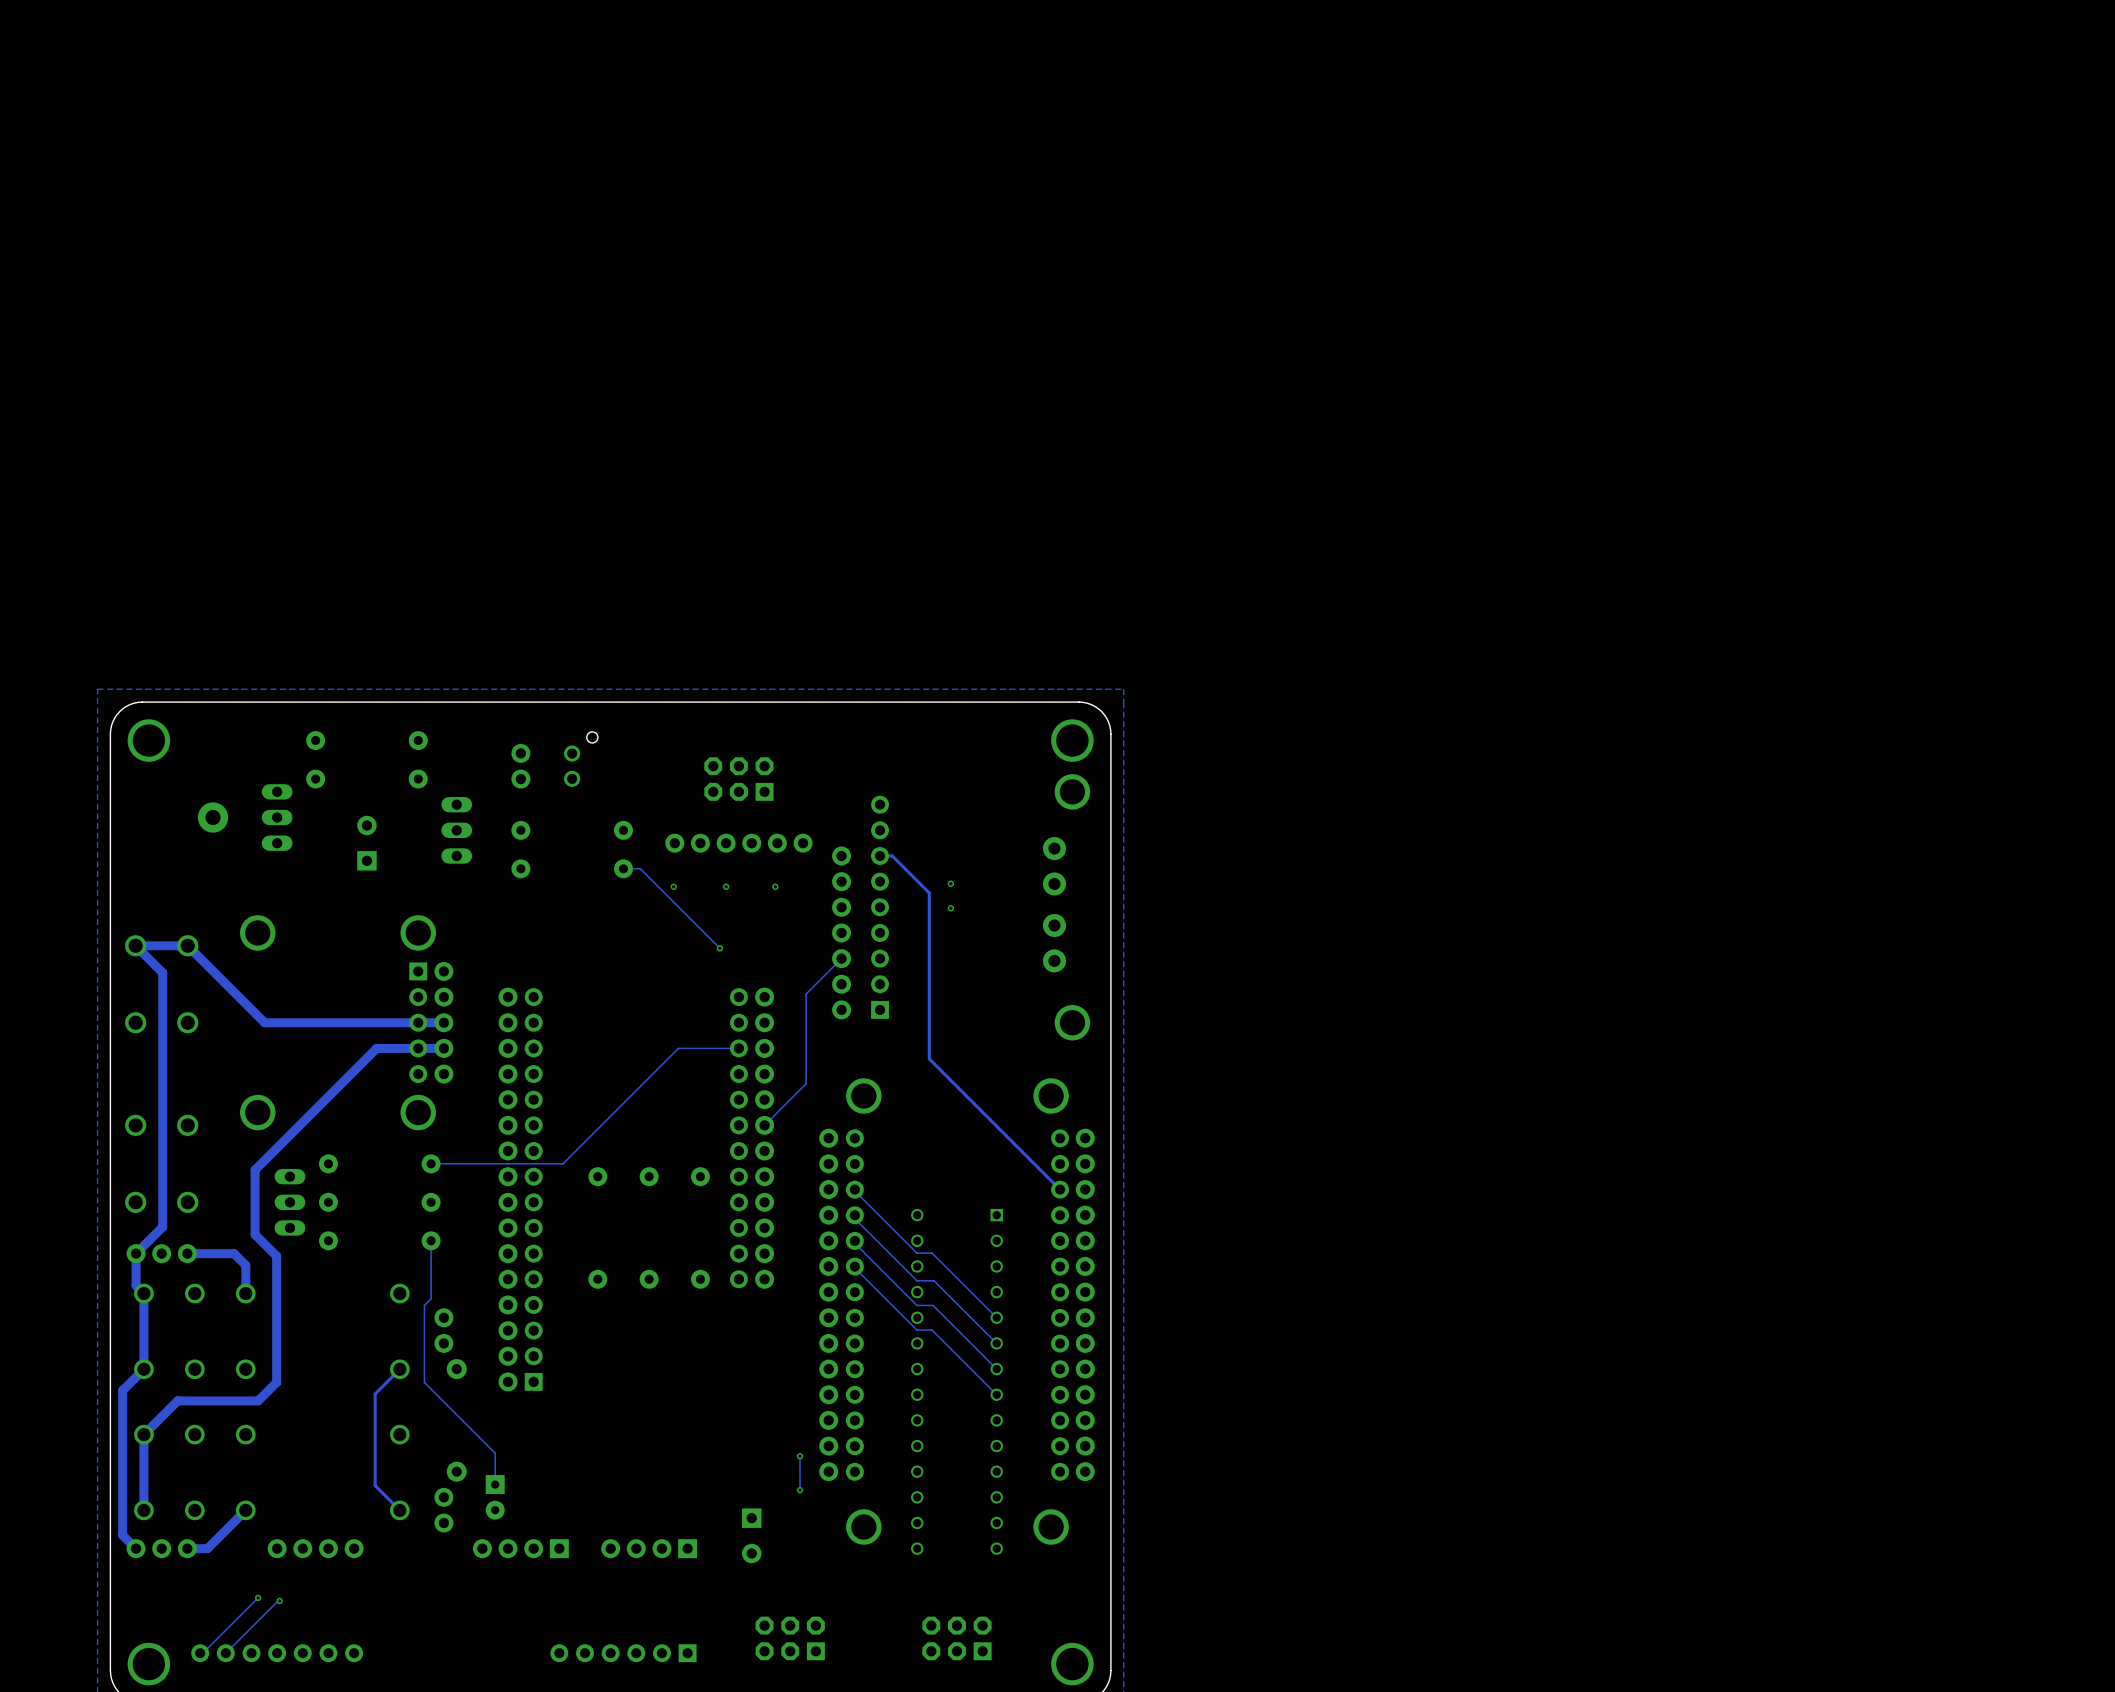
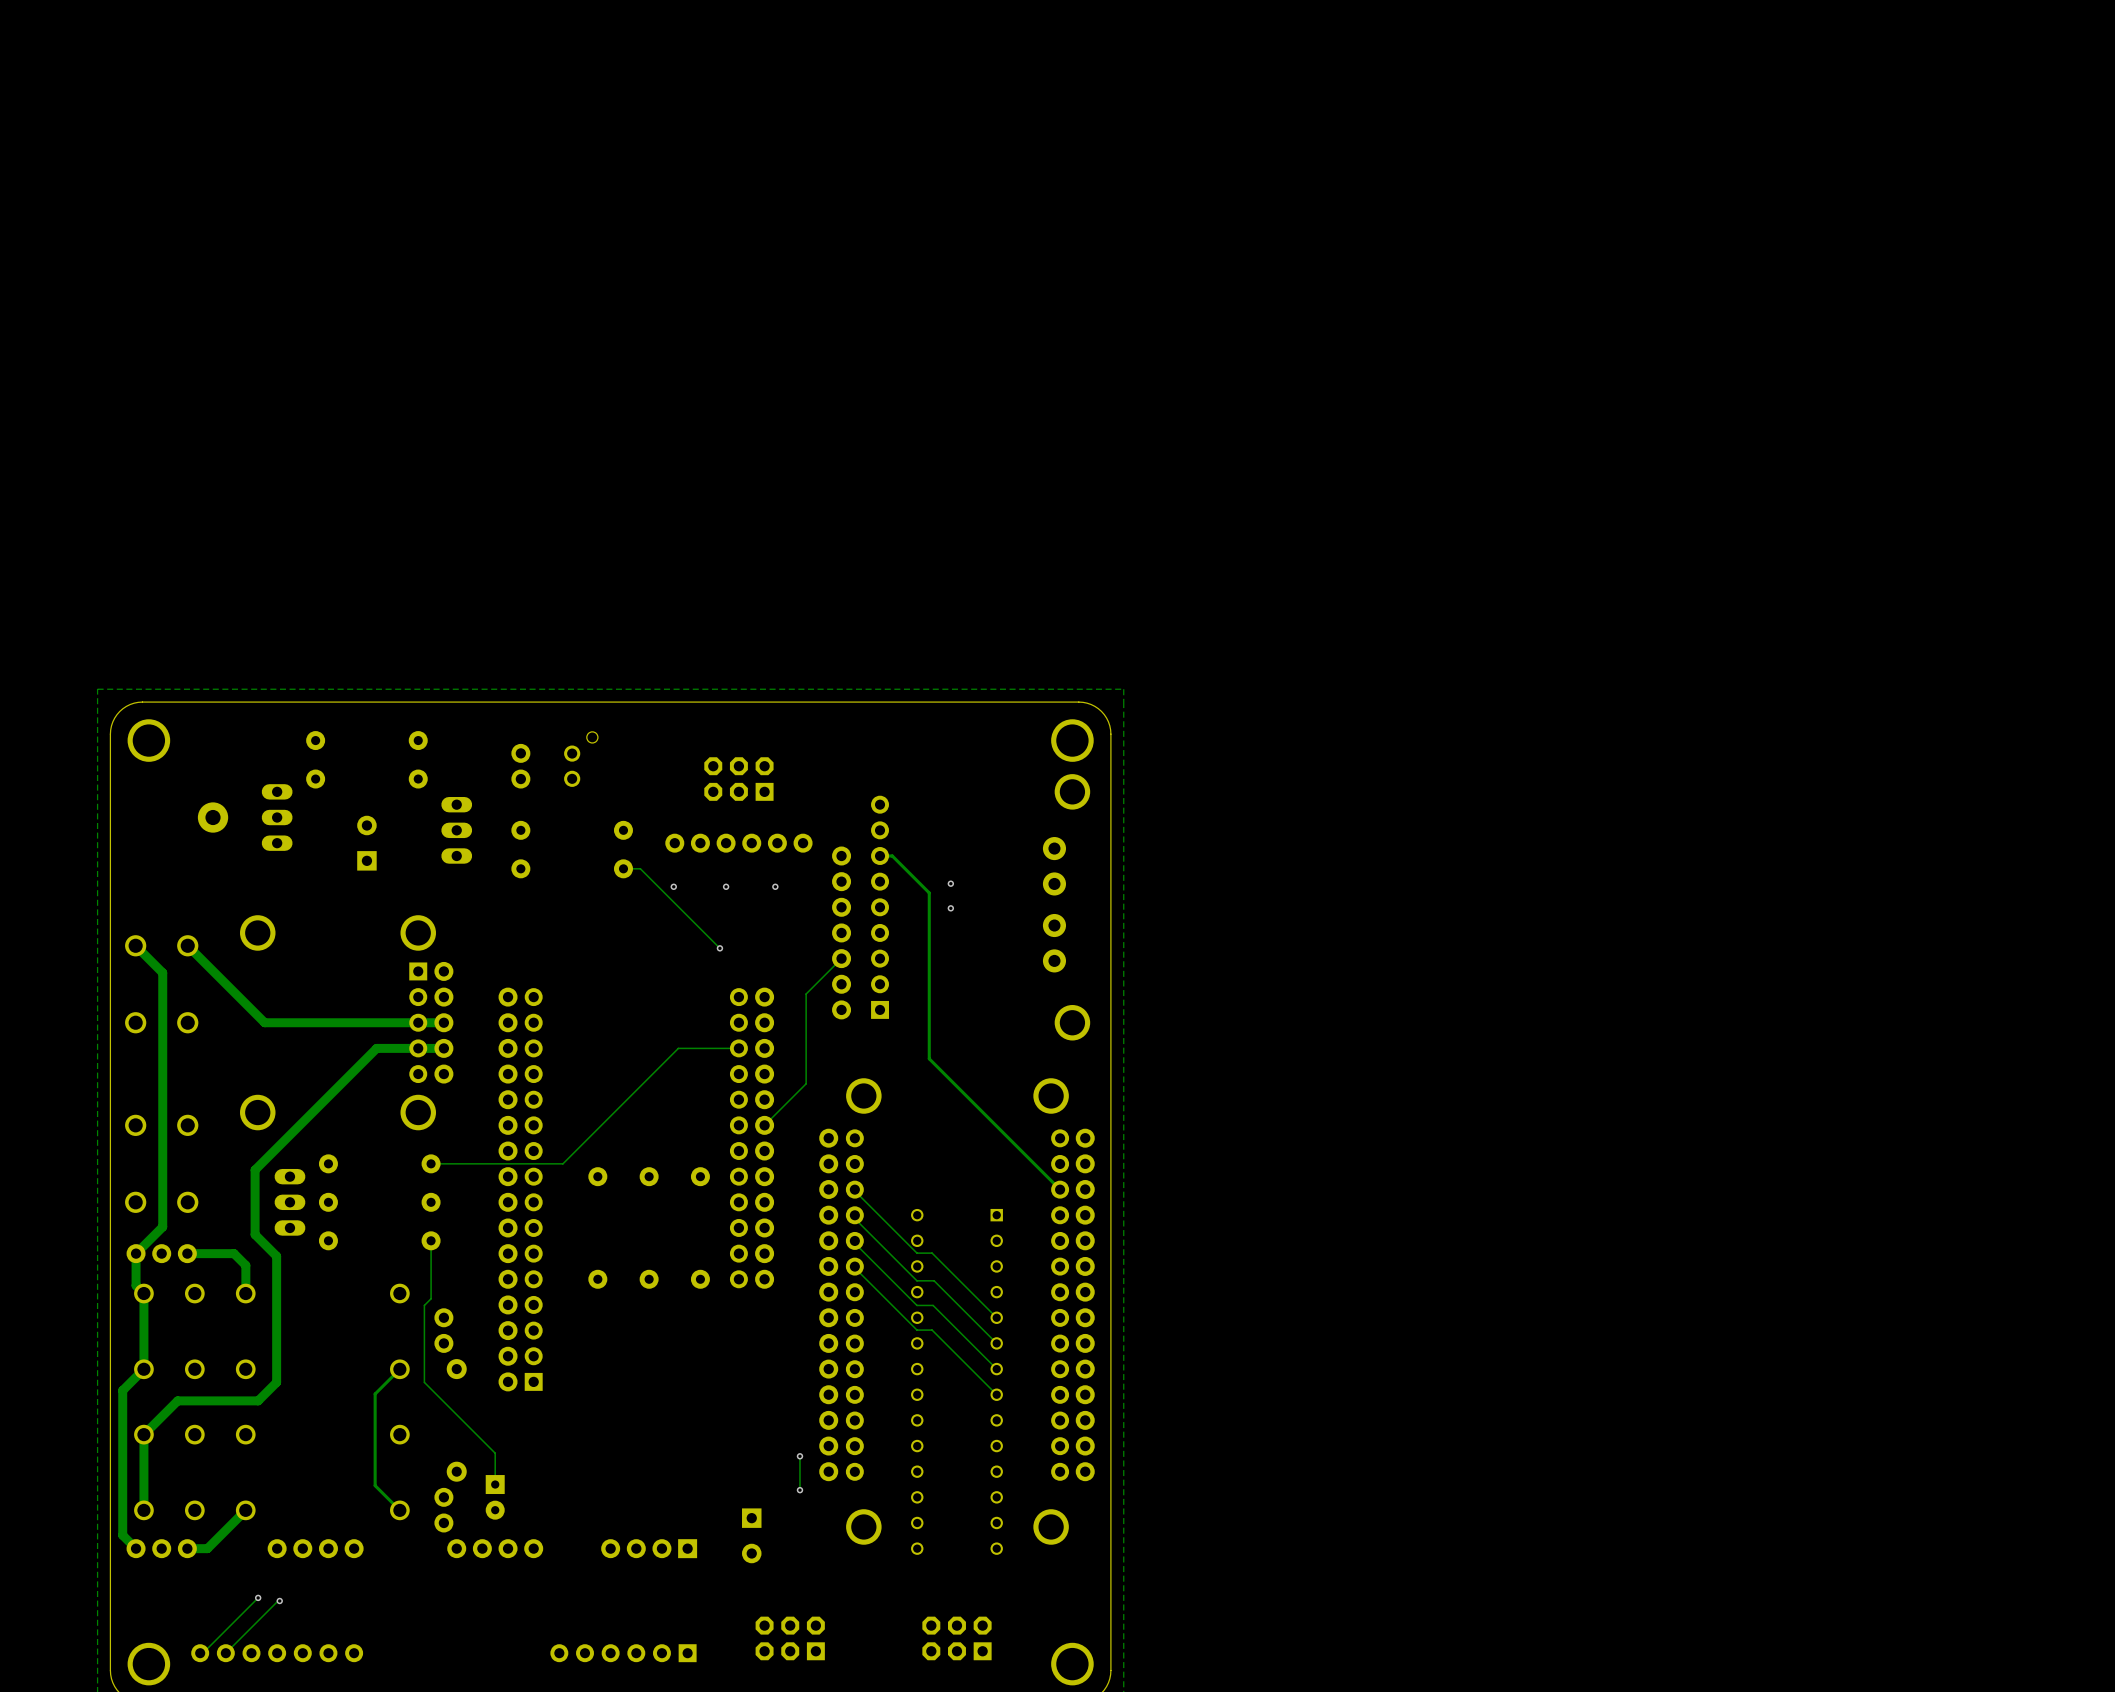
track: (187, 945) (135, 945) -> none
part: none -> (495, 1548)
part: (520, 1548) -> none

